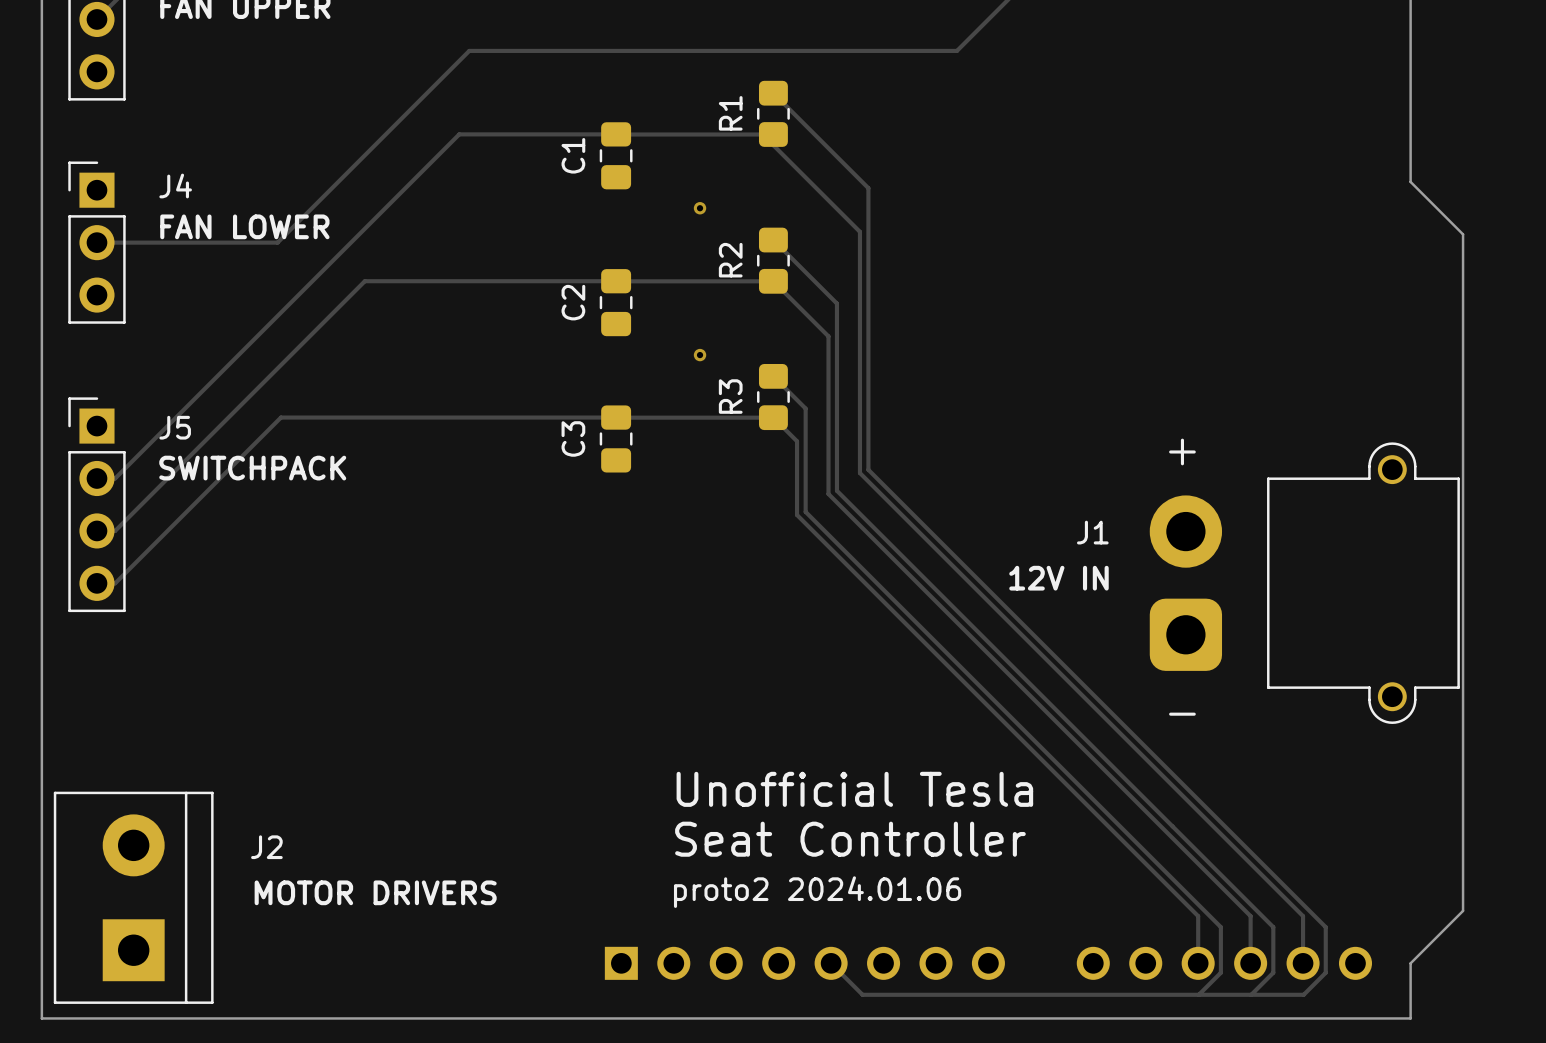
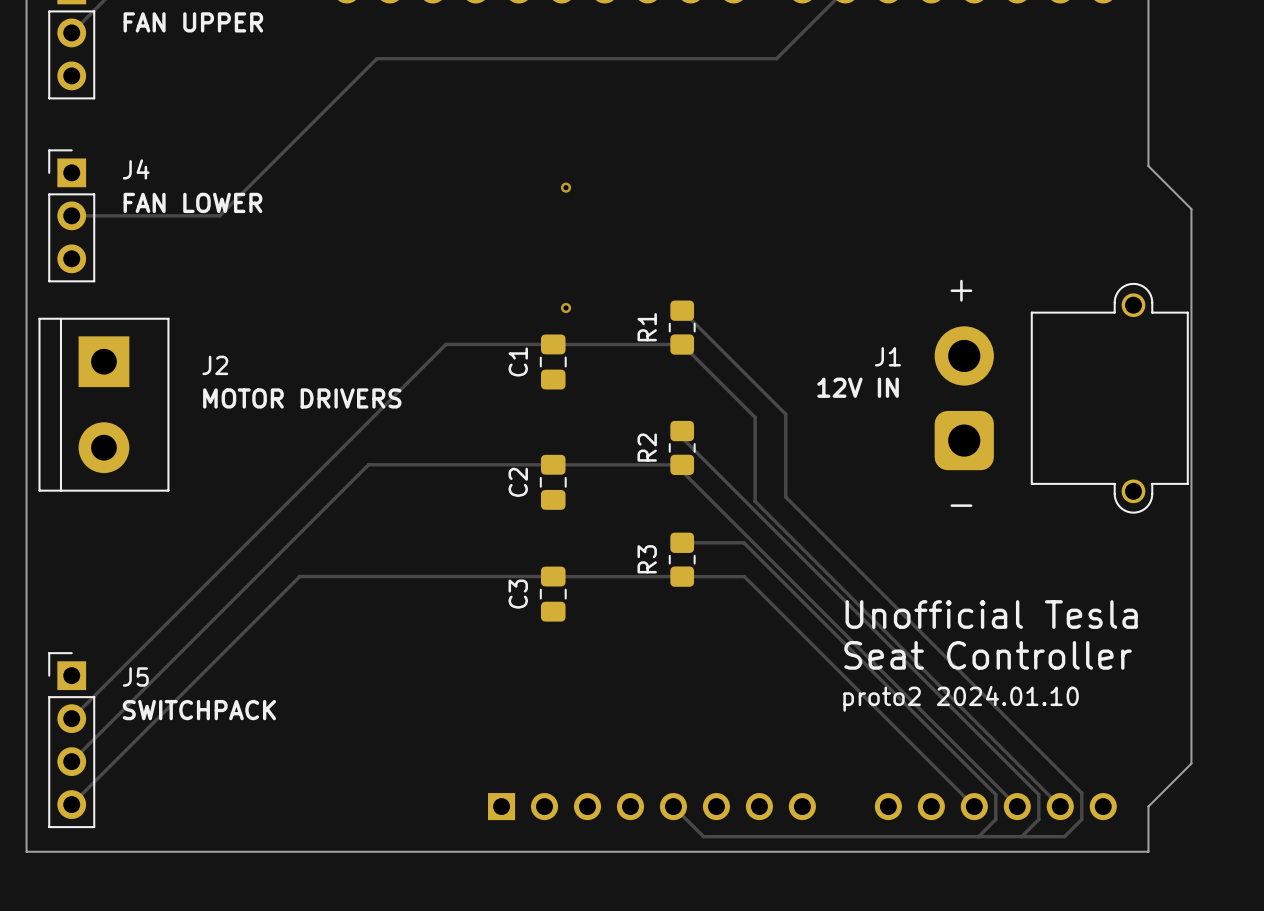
track: (773, 93) (868, 188) (868, 469) (1325, 927) (1325, 972) (1303, 994) (862, 994) -> (682, 310) (785, 414) (785, 497) (1081, 793) (1081, 819) (1064, 836) (703, 836) (699, 832)
R1 position: (773, 113) -> (682, 327)
track: (626, 134) (459, 134) (115, 478) (96, 478) -> none
track: (626, 134) (773, 134) (773, 145) (859, 231) (859, 473) (1303, 916) (1303, 958) -> none
C1 position: (616, 155) -> (553, 361)
track: (773, 240) (836, 303) (836, 490) (1273, 927) (1273, 972) (1251, 994) -> none
R2 position: (773, 260) -> (682, 447)
track: (626, 281) (773, 281) (828, 336) (828, 494) (1250, 916) (1250, 963) -> (71, 761) (368, 464) (682, 464) (682, 471) (1017, 806)
track: (626, 281) (364, 281) (115, 530) (96, 530) -> none
C2 position: (616, 302) -> (553, 482)
track: (773, 376) (805, 408) (805, 511) (1220, 927) (1220, 972) (1198, 994) -> none
R3 position: (773, 397) -> (682, 559)
track: none -> (561, 344) (445, 344) (71, 718)
track: none -> (561, 344) (682, 344) (755, 417) (755, 501) (1060, 806)
C3 position: (616, 438) -> (553, 594)
text position: SWITCHPACK (252, 468) -> SWITCHPACK (199, 710)
J5 position: (96, 504) -> (71, 740)
track: none -> (682, 431) (682, 438) (1038, 794) (1038, 819) (1021, 836)
text position: 12V IN (1058, 578) -> 12V IN (858, 387)
track: (96, 583) (115, 583) (280, 417) (773, 417) (797, 441) (797, 515) (1198, 916) (1198, 963) -> (561, 576) (744, 576) (974, 806)
J1 position: (1304, 583) -> (1061, 398)
track: none -> (682, 542) (743, 542) (995, 794) (995, 819) (978, 836)
track: none -> (561, 576) (299, 576) (71, 804)
text position: Unofficial Tesla (854, 789) -> Unofficial Tesla (991, 614)
text: none -> proto2 2024.01.10 (961, 698)
text position: Seat Controller (850, 839) -> Seat Controller (988, 655)
text position: MOTOR DRIVERS (375, 892) -> MOTOR DRIVERS (302, 398)
text: proto2 2024.01.06 (817, 892) -> none
J2 rotation: 0° (133, 897) -> 180° (103, 404)
J2 position: (133, 897) -> (103, 404)

